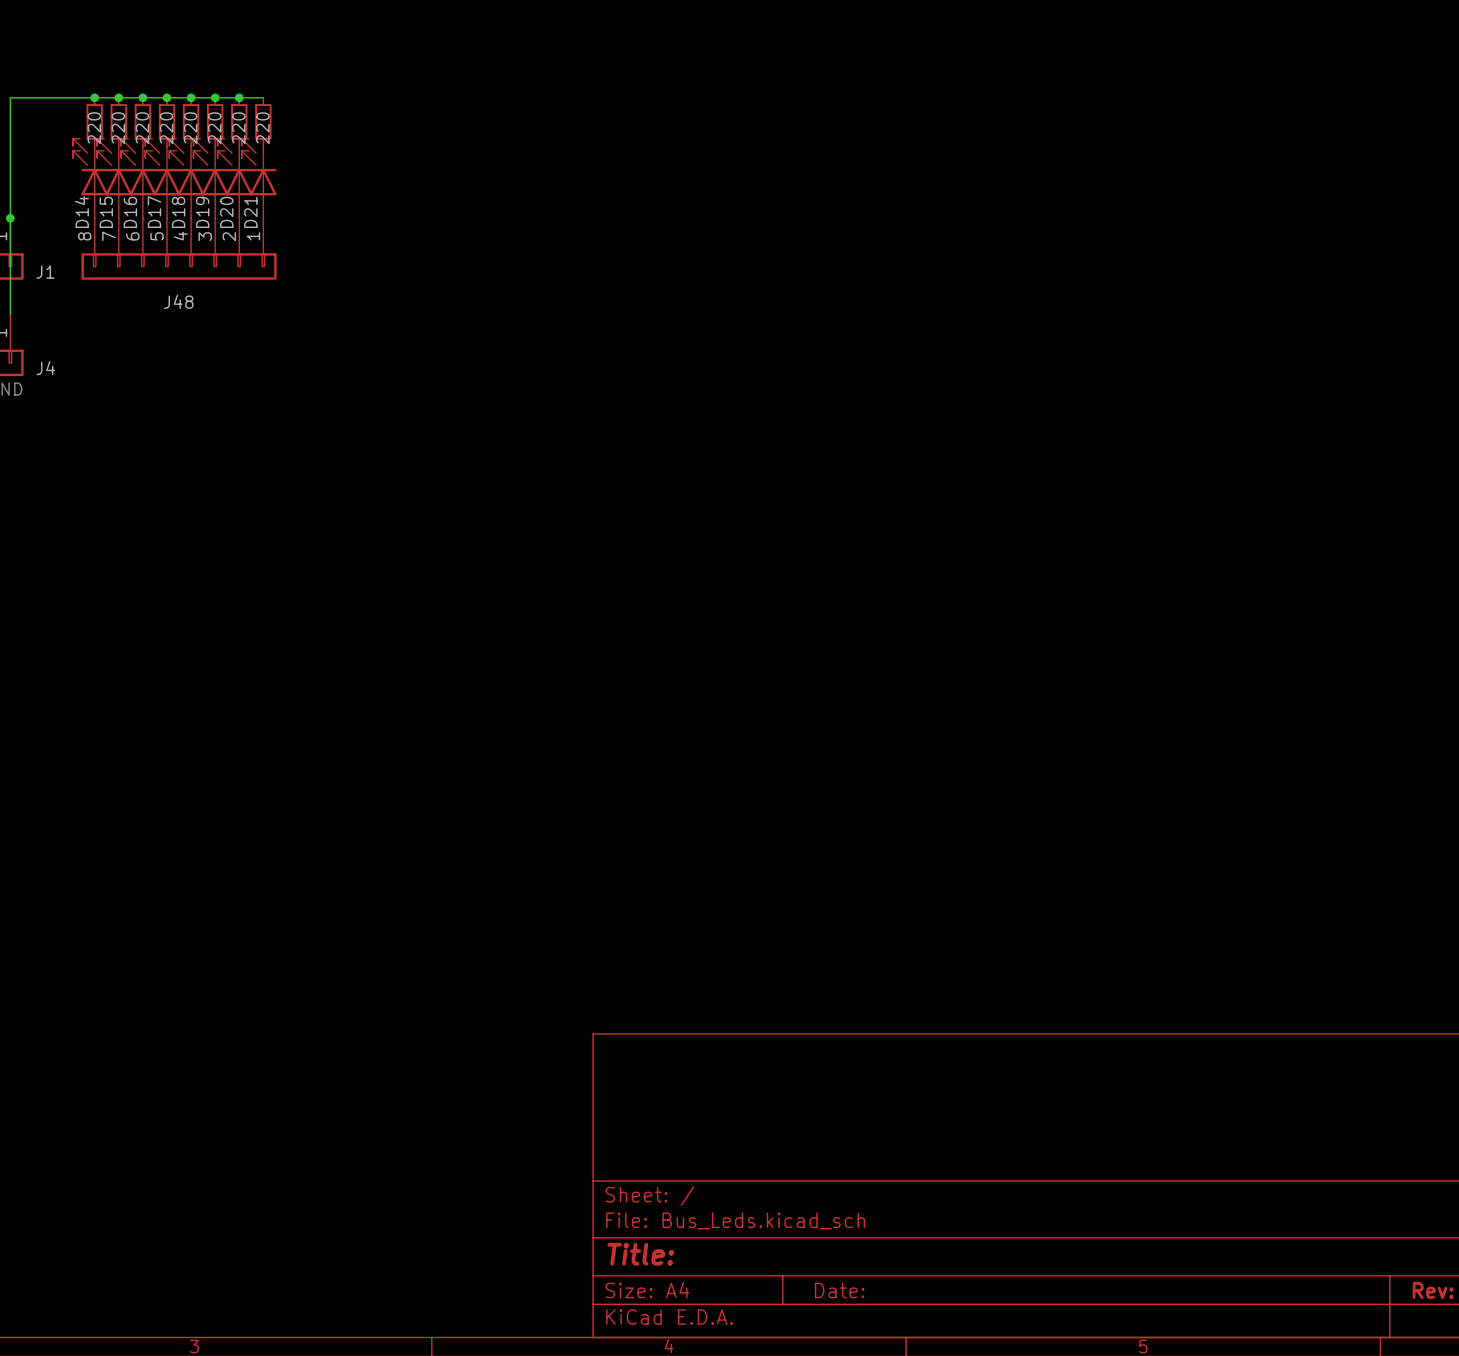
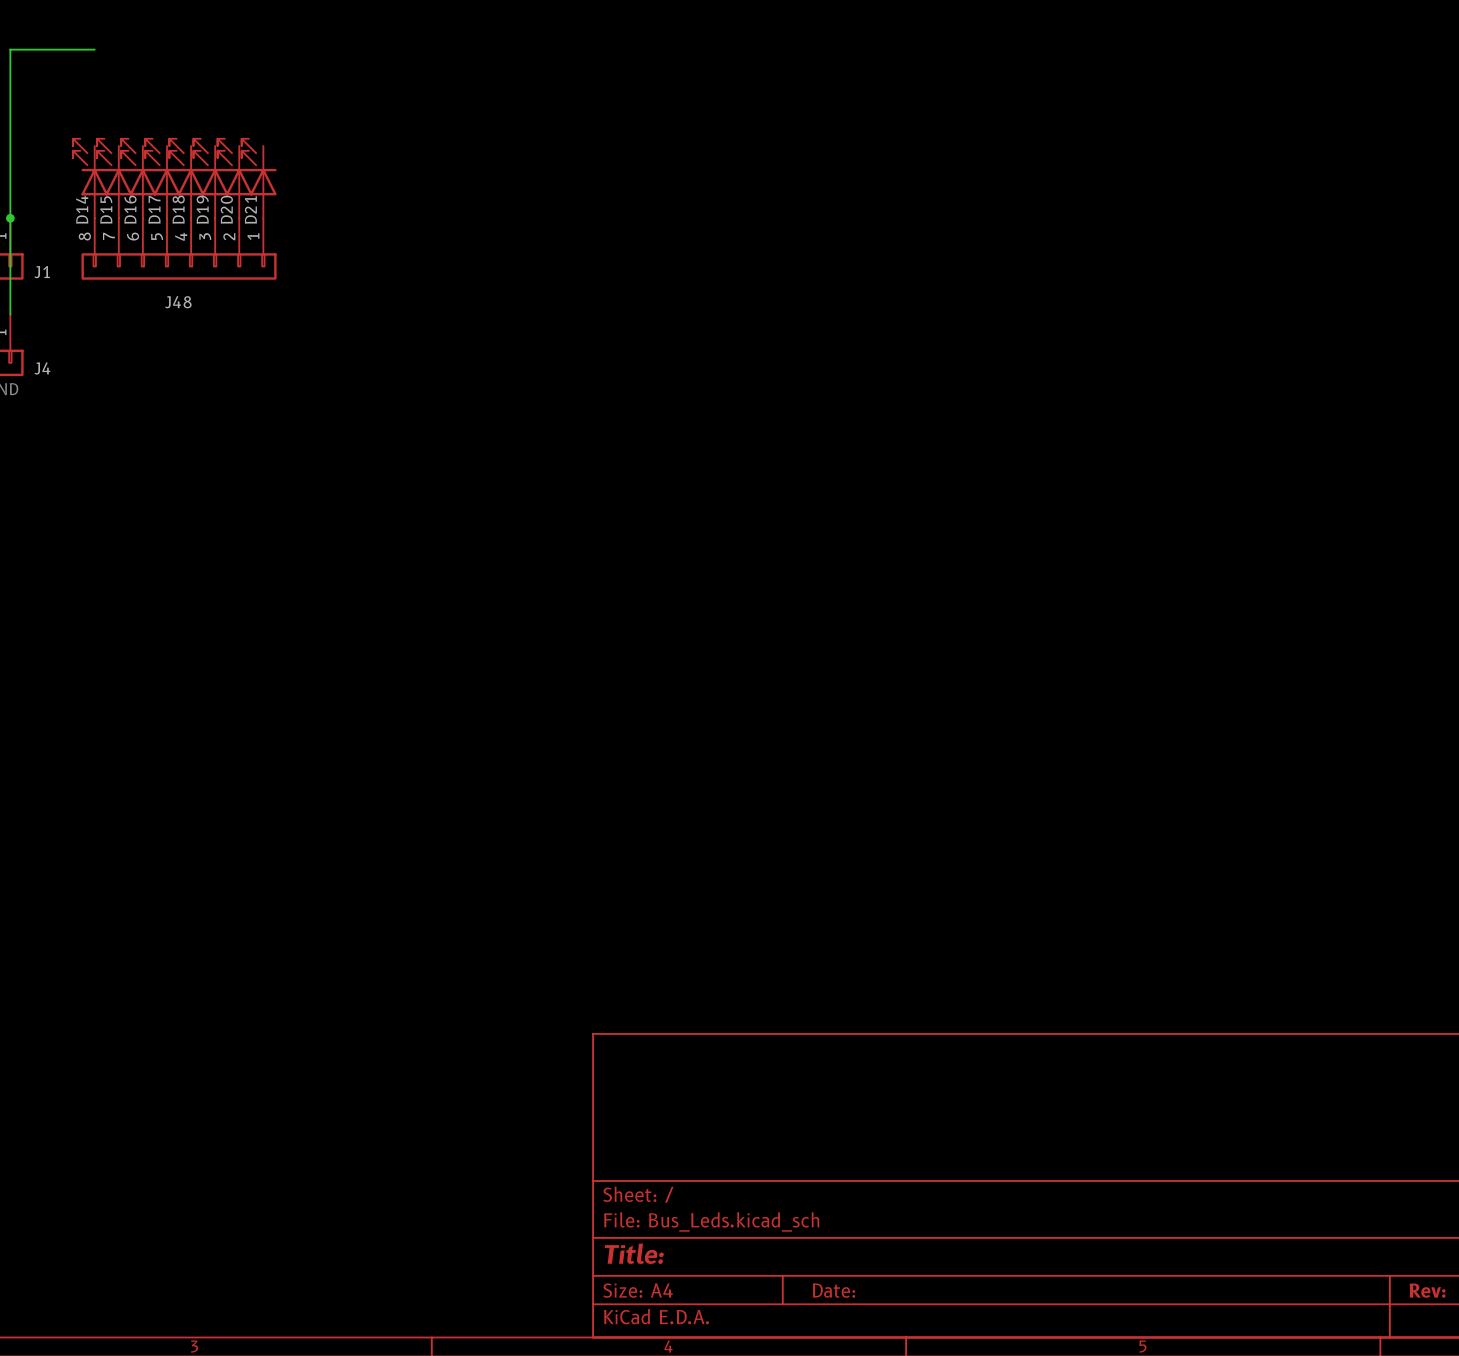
wire: (10, 97) (263, 97) -> (10, 97) (10, 49) (94, 49)
junction: (94, 97) -> none
junction: (118, 97) -> none
junction: (142, 97) -> none
junction: (166, 97) -> none
junction: (191, 97) -> none
junction: (215, 97) -> none
junction: (239, 97) -> none
part: 220 (94, 121) -> none
part: 220 (118, 121) -> none
part: 220 (142, 121) -> none
part: 220 (166, 121) -> none
part: 220 (191, 121) -> none
part: 220 (215, 121) -> none
part: 220 (239, 121) -> none
part: 220 (263, 121) -> none

